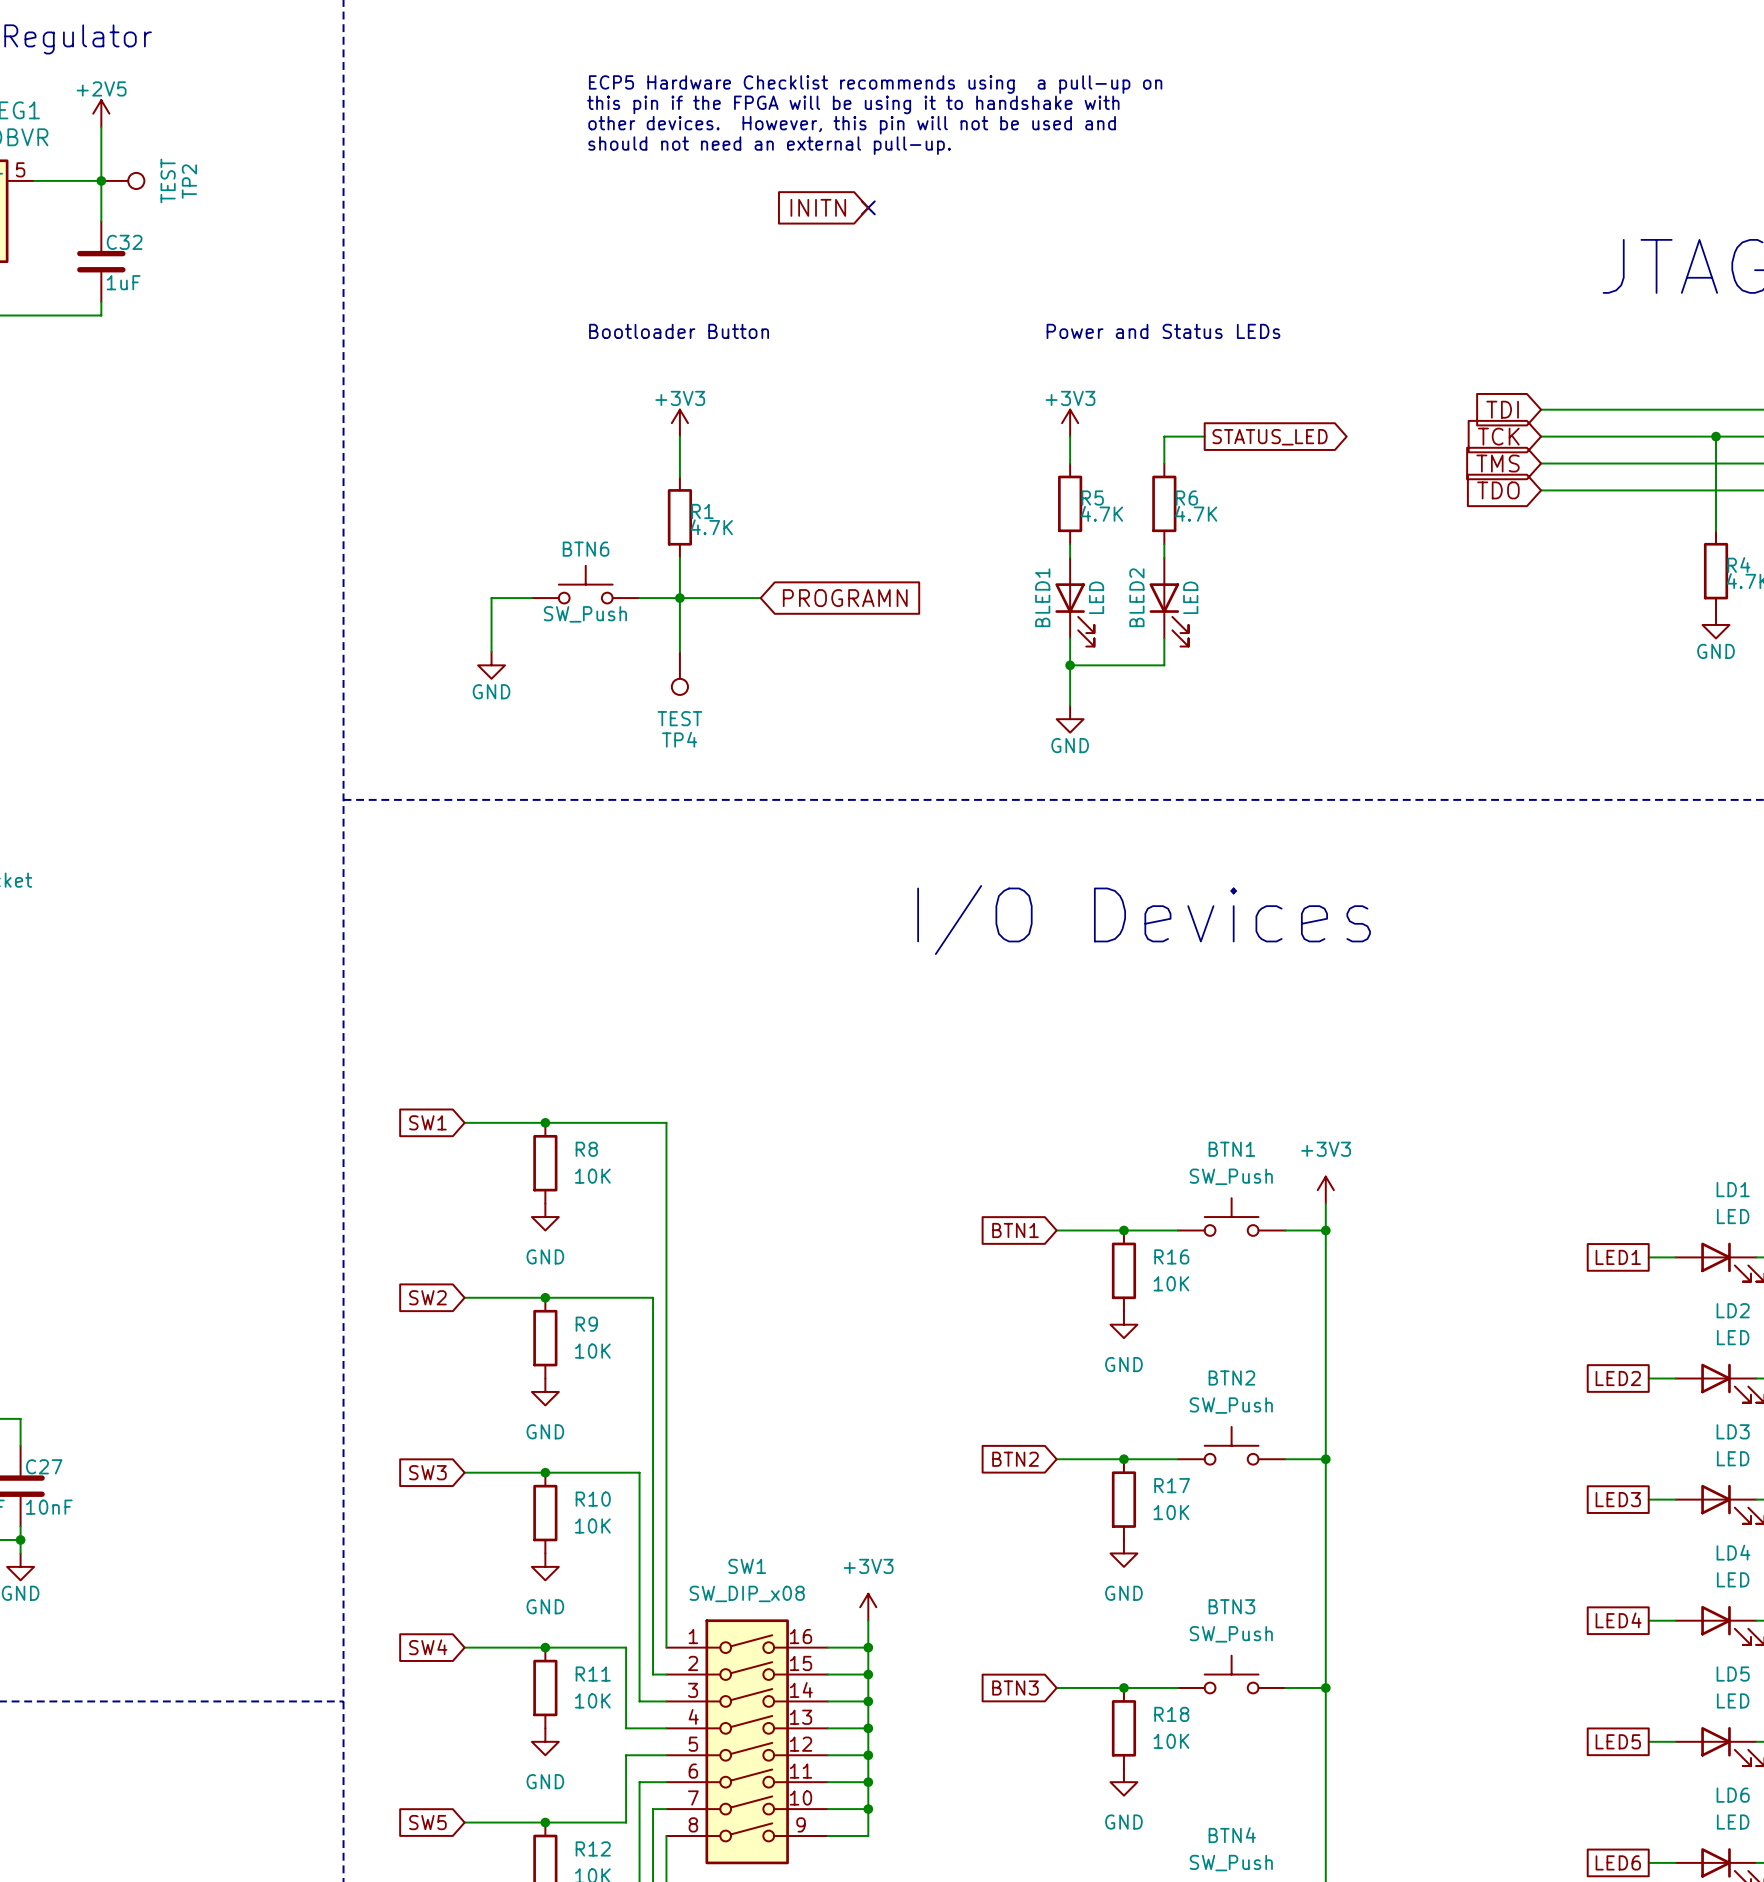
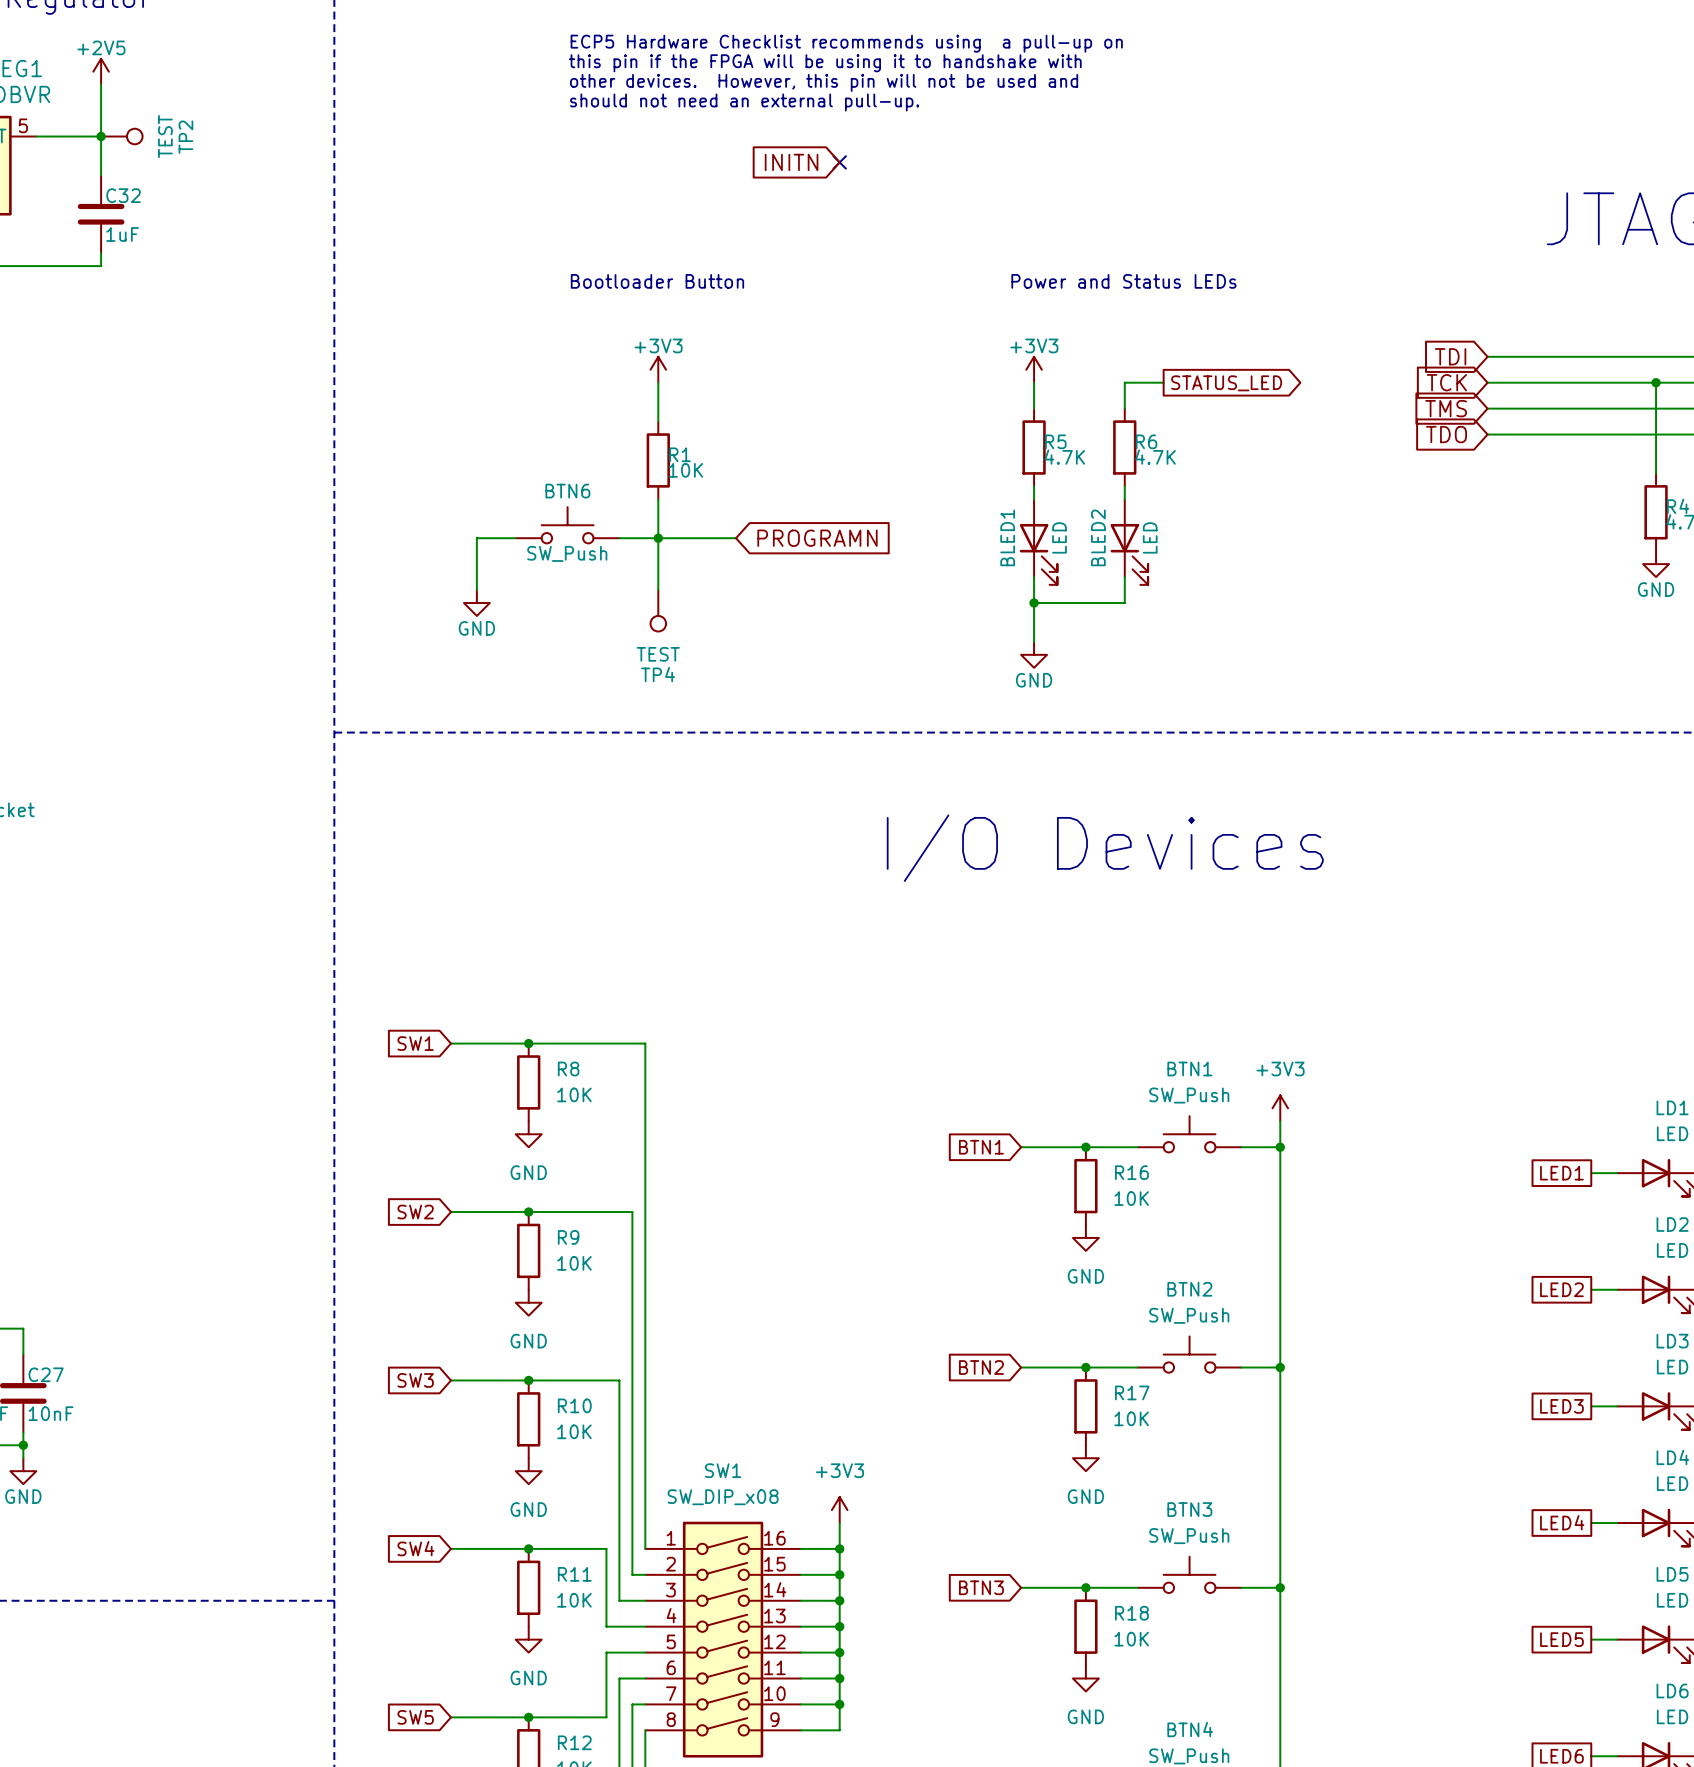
R1 value: 4.7K (711, 527) -> 10K (685, 470)

